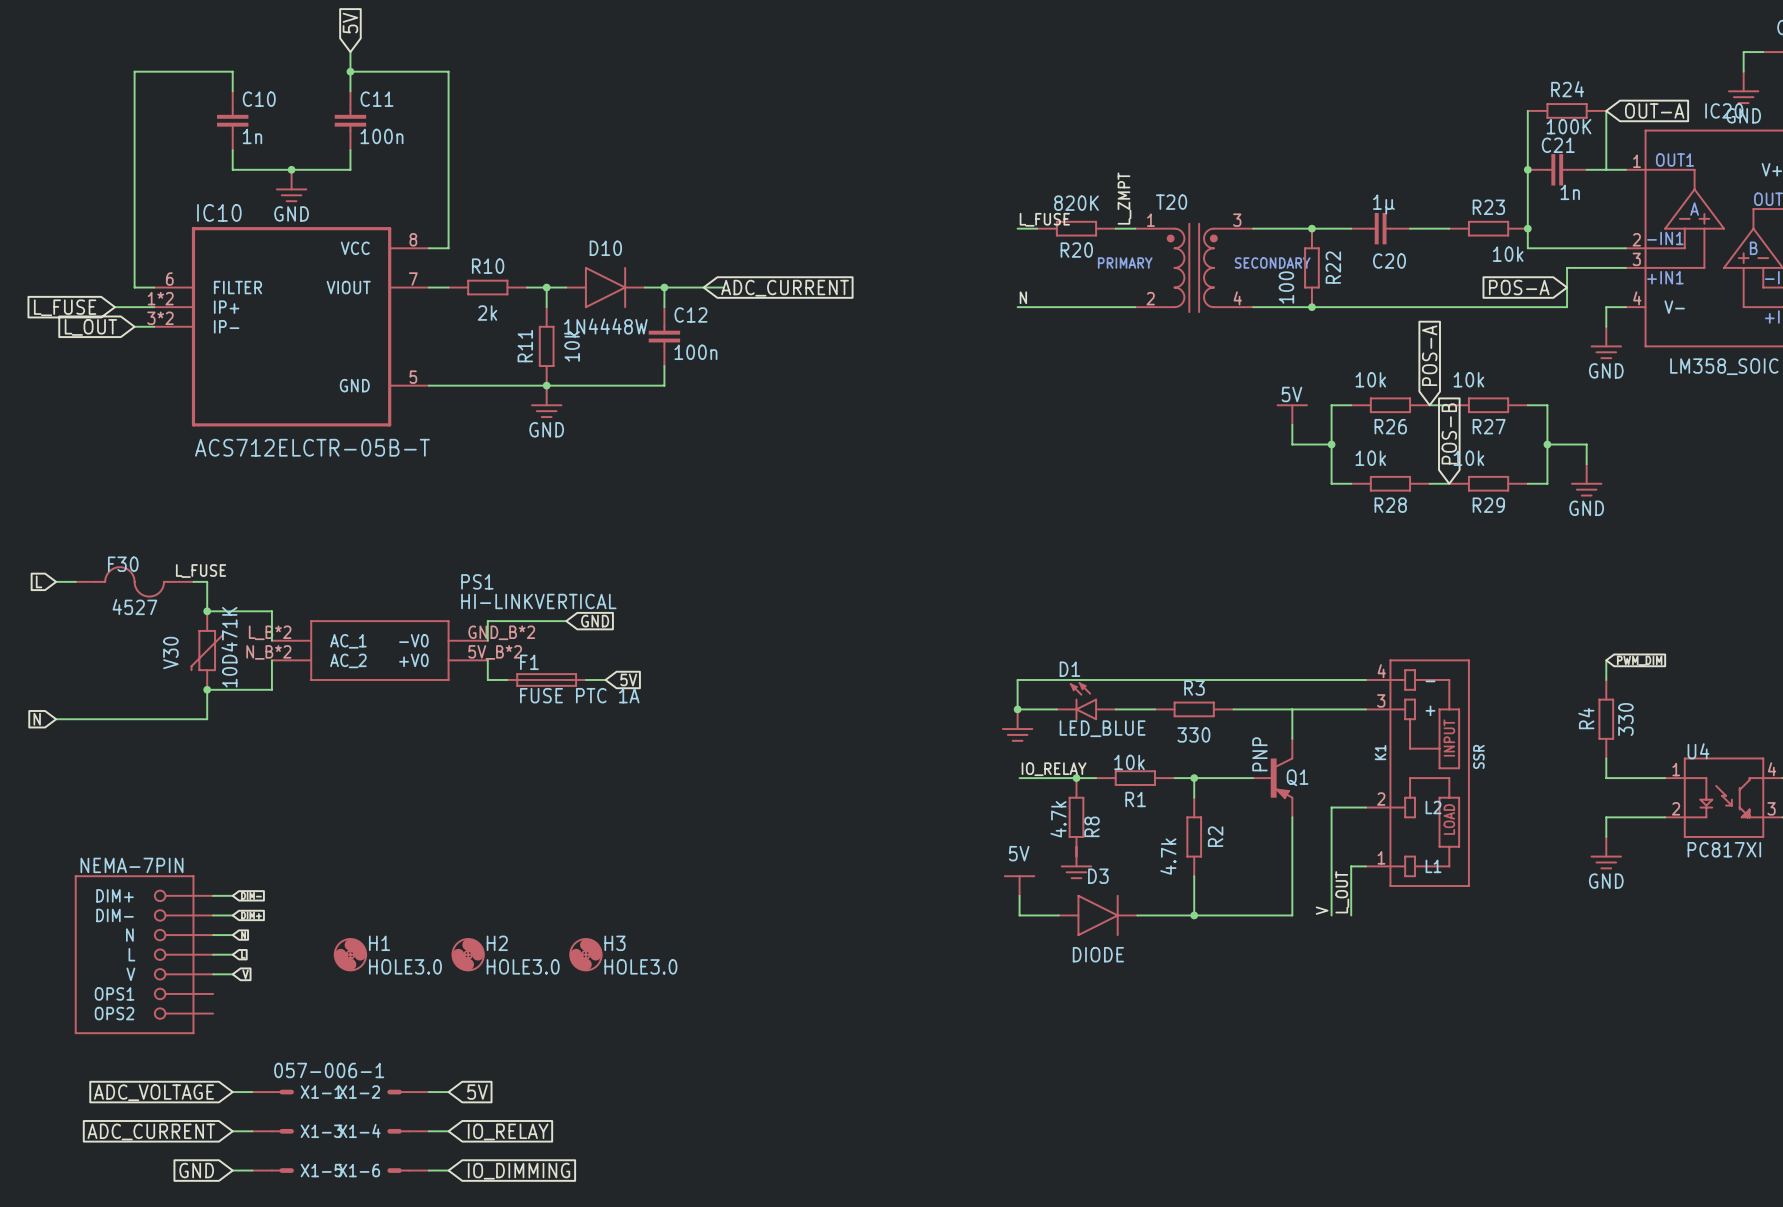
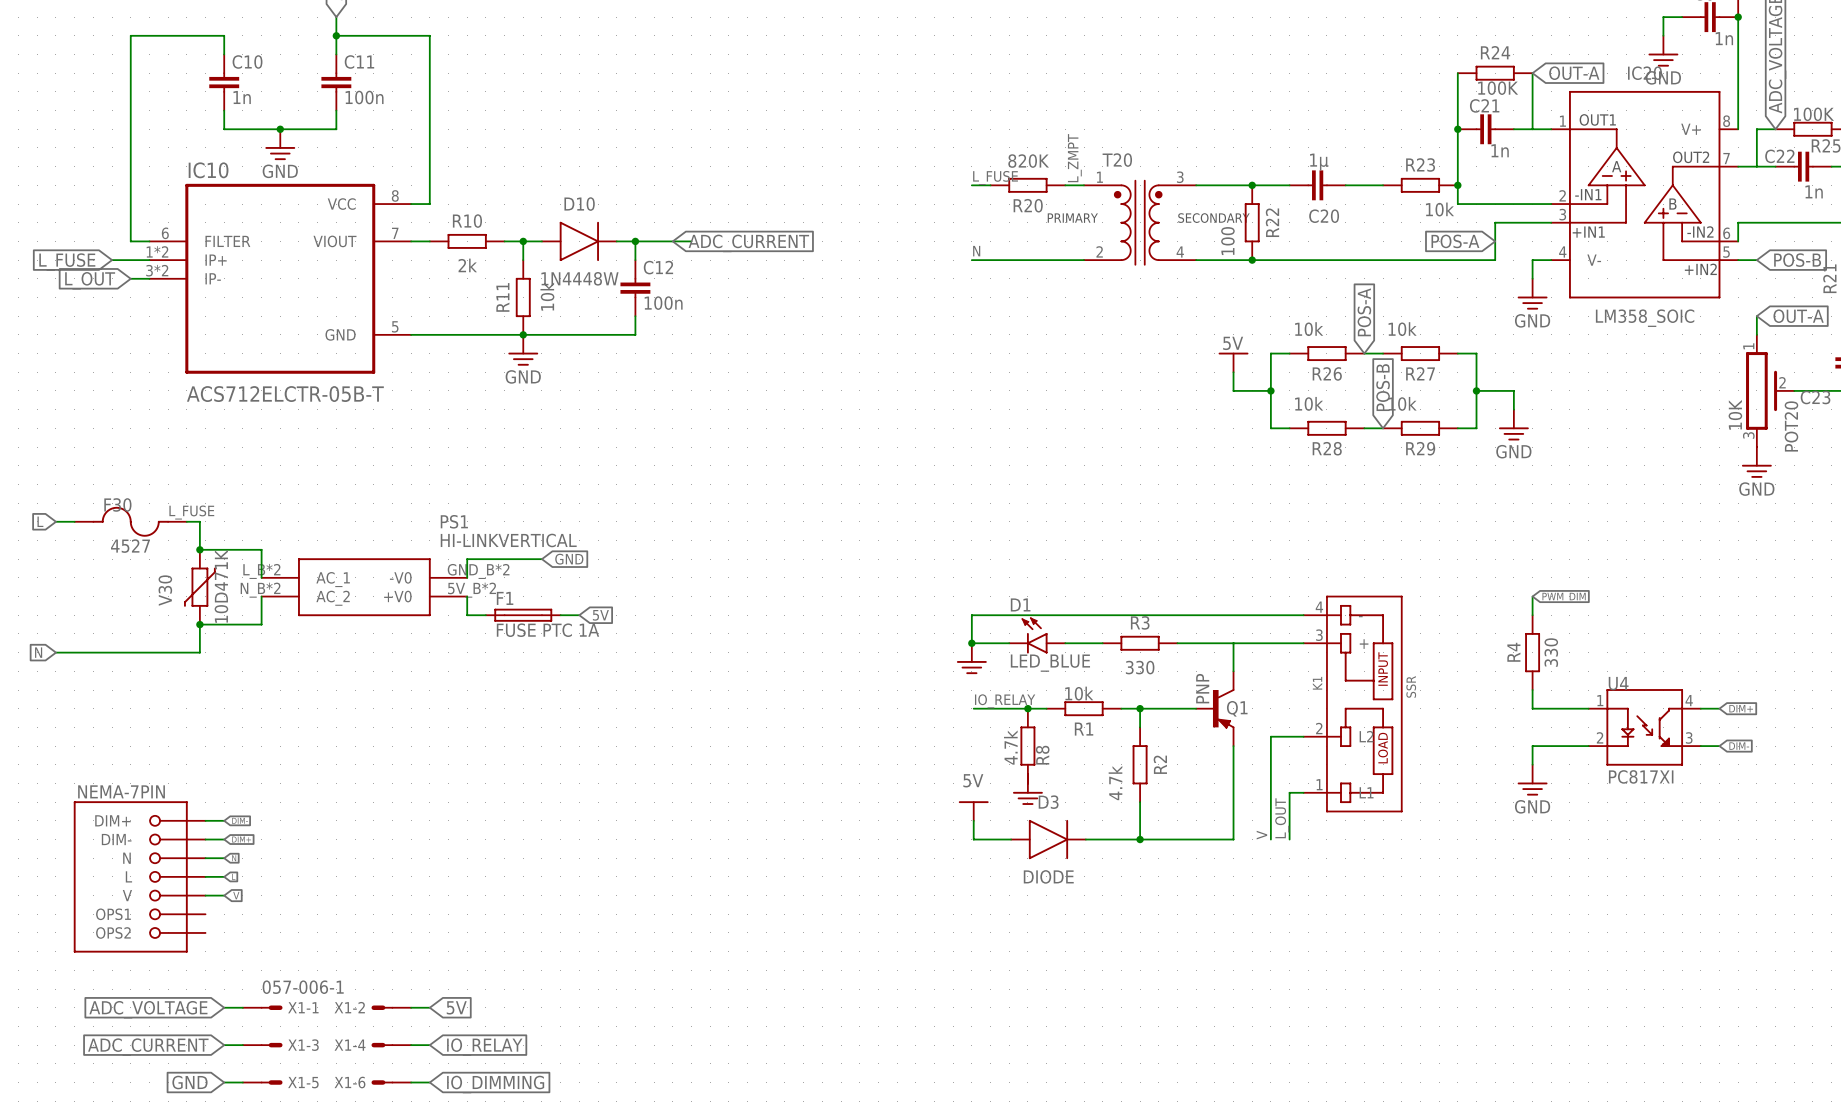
H1: HOLE3.0 (350, 954) -> none
H2: HOLE3.0 (468, 954) -> none
H3: HOLE3.0 (585, 954) -> none

